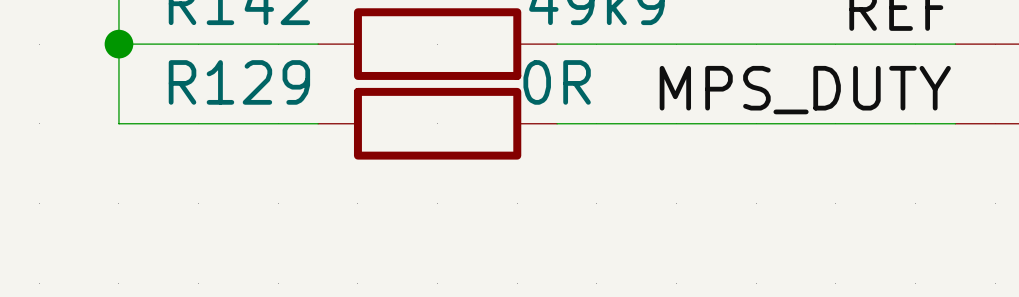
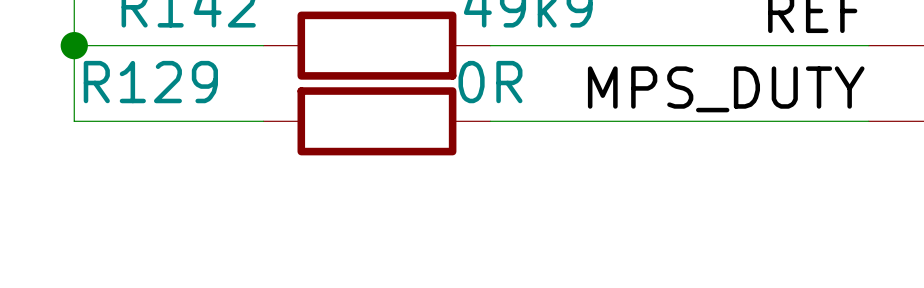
R129 name position: R129 (239, 82) -> R129 (150, 82)

